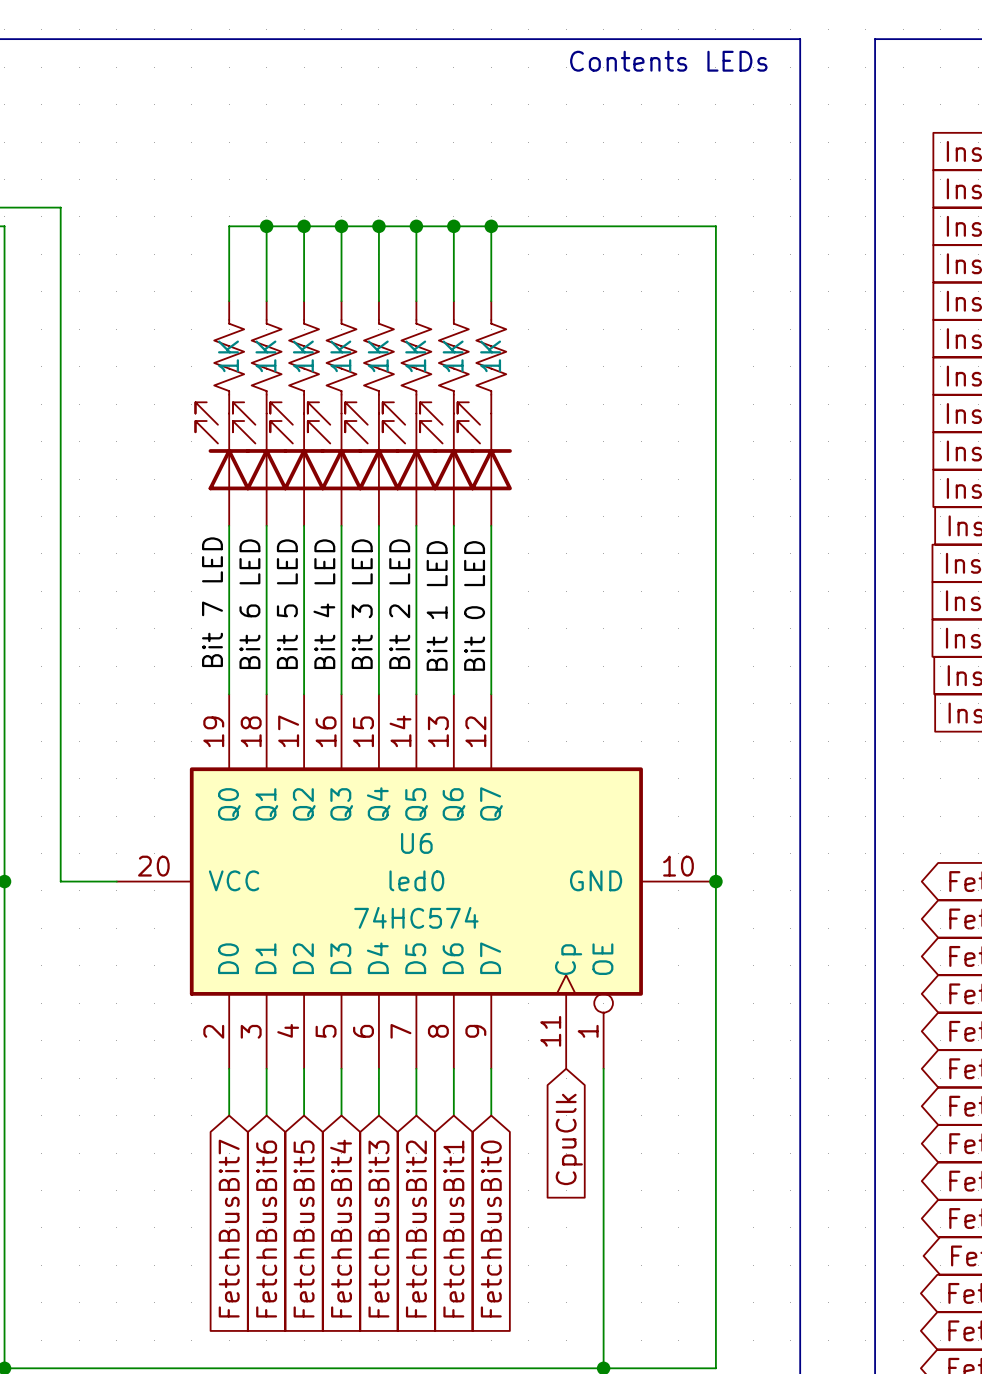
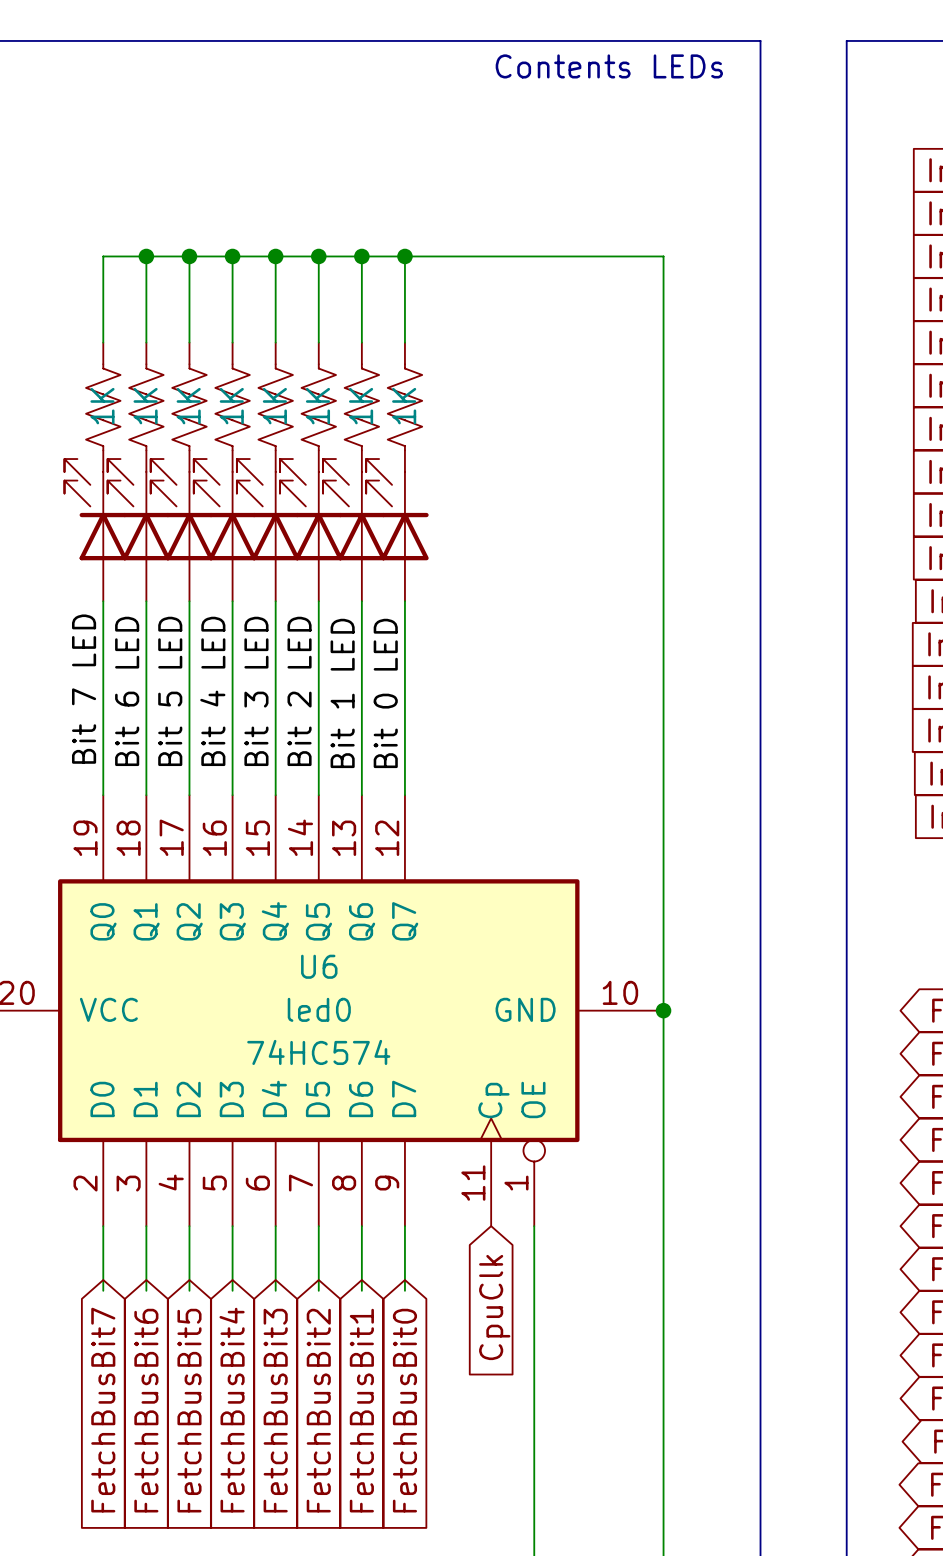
wire: none -> (103, 1280) (103, 1290)
wire: none -> (146, 1280) (146, 1290)
wire: none -> (189, 1280) (189, 1290)
wire: none -> (232, 1280) (232, 1290)
wire: none -> (275, 1280) (275, 1290)
wire: none -> (318, 1280) (318, 1290)
wire: none -> (361, 1280) (361, 1290)
wire: none -> (404, 1280) (404, 1290)

